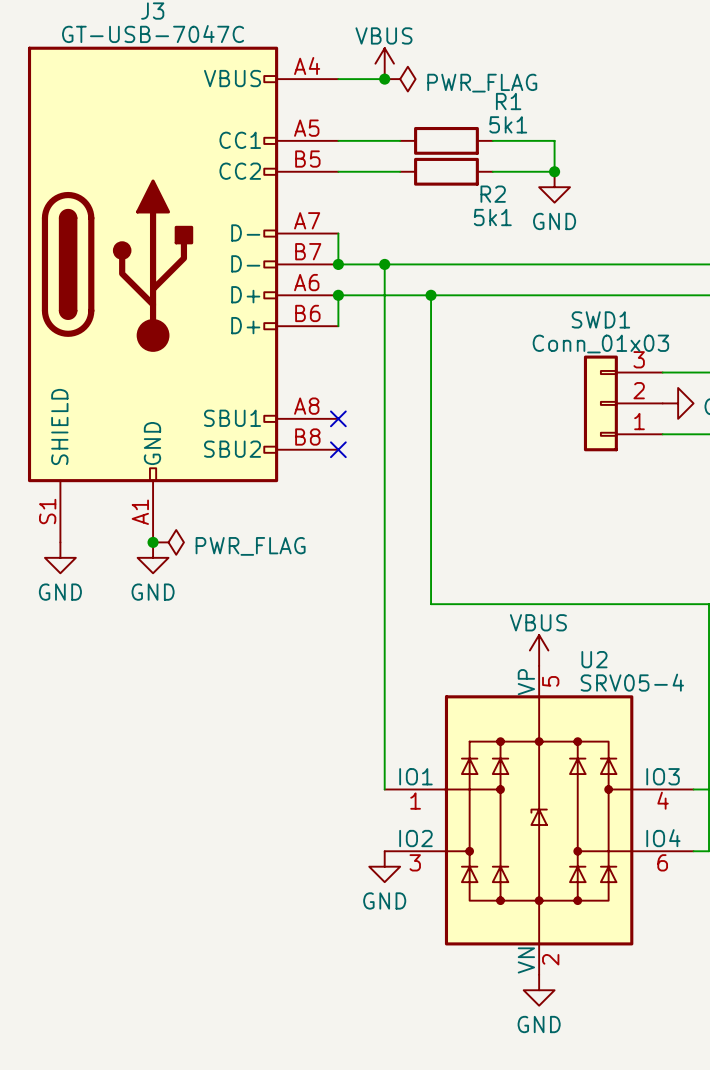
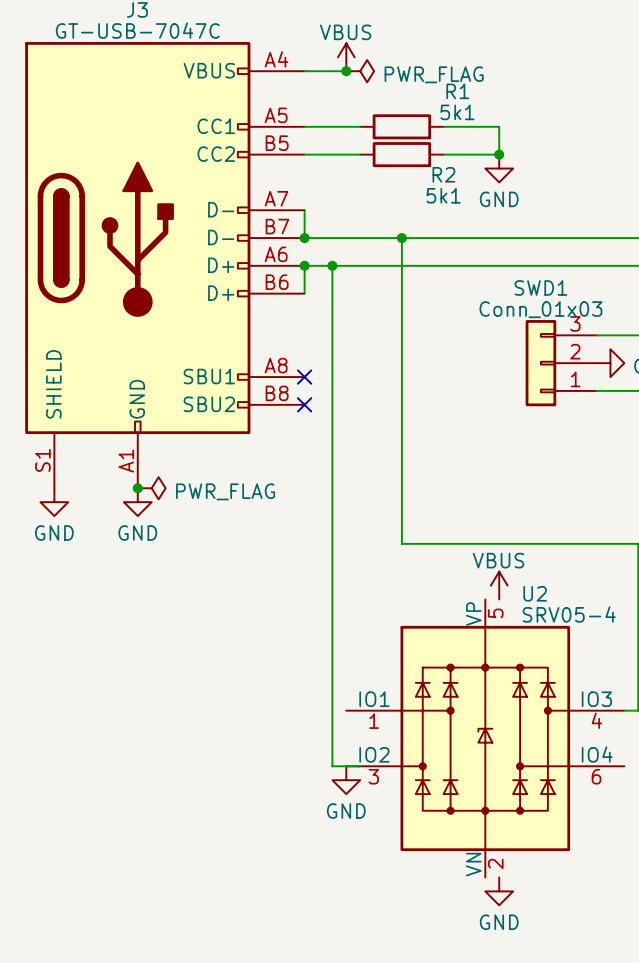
wire: (384, 264) (384, 789) -> none
junction: (384, 264) -> none
junction: none -> (401, 238)
wire: none -> (332, 265) (332, 766) (360, 766)
junction: none -> (332, 265)
wire: (431, 295) (431, 604) (446, 604) -> (401, 238) (401, 543)
junction: (431, 295) -> none
power symbol position: VBUS (539, 650) -> VBUS (499, 585)
wire: (709, 789) (709, 851) (693, 851) -> none
power symbol position: GND (539, 990) -> GND (499, 891)

